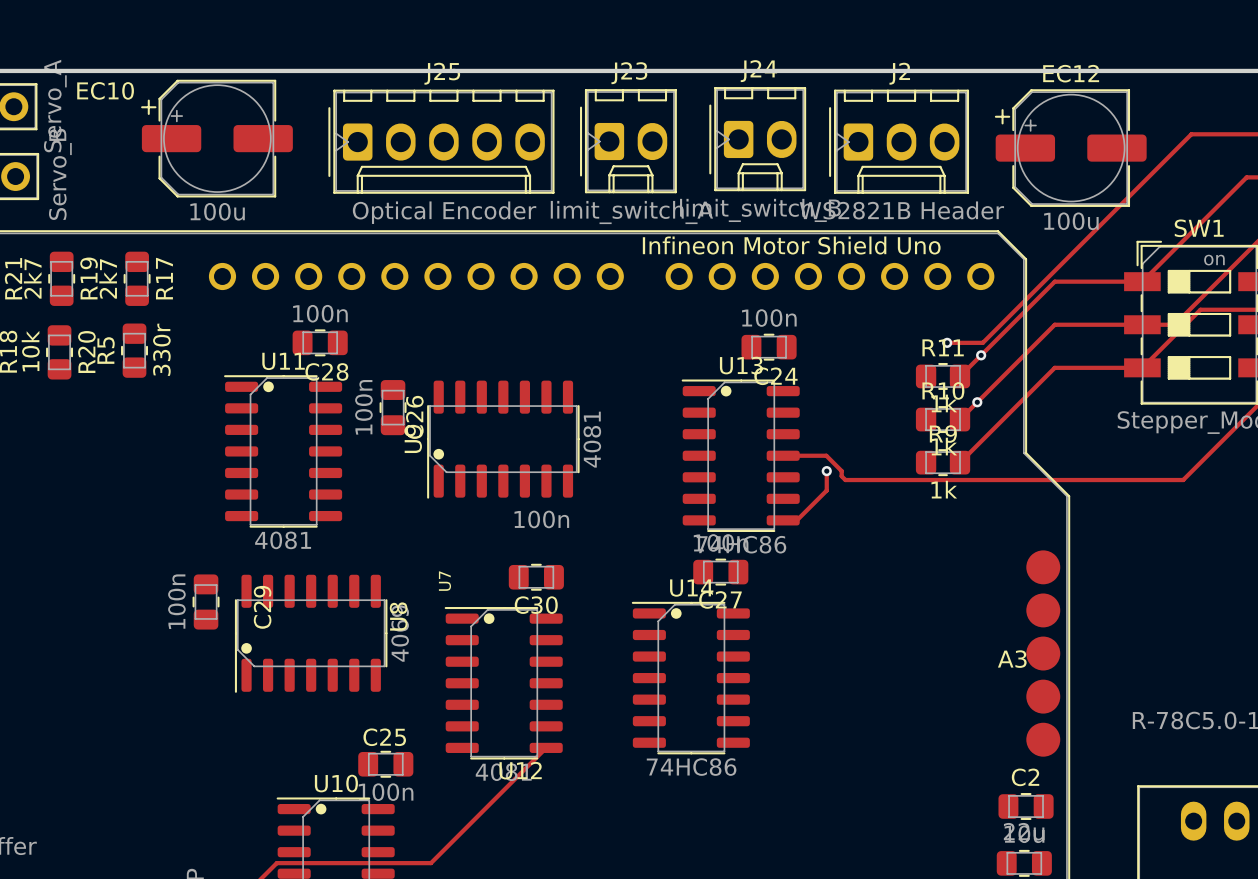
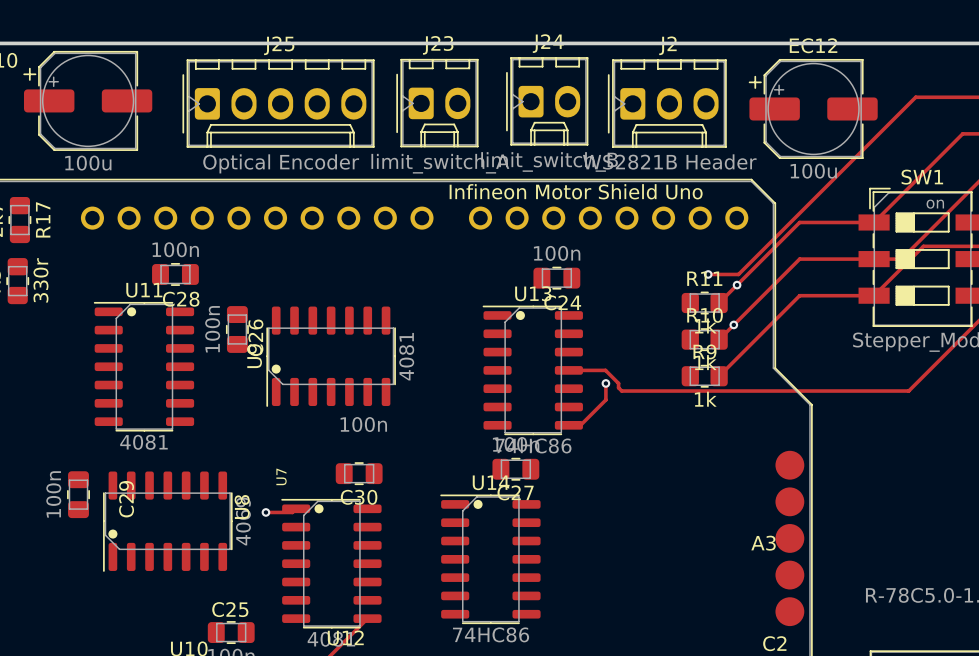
top track: none -> (296, 508) (292, 512) (265, 512)
via: none -> (265, 512)

